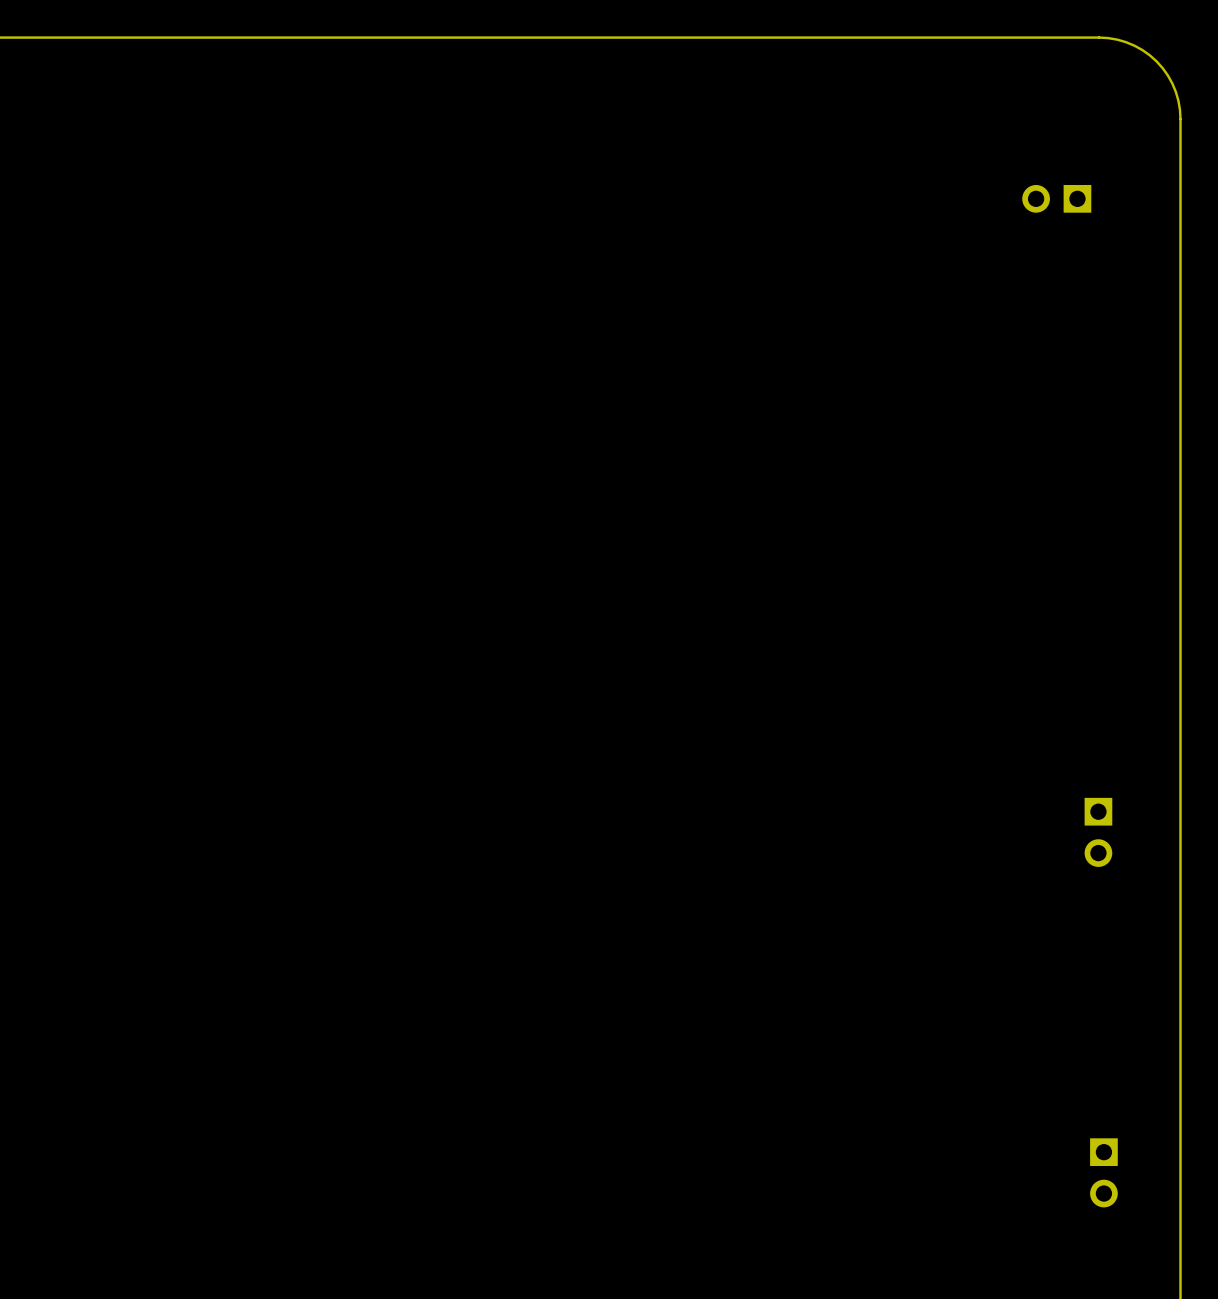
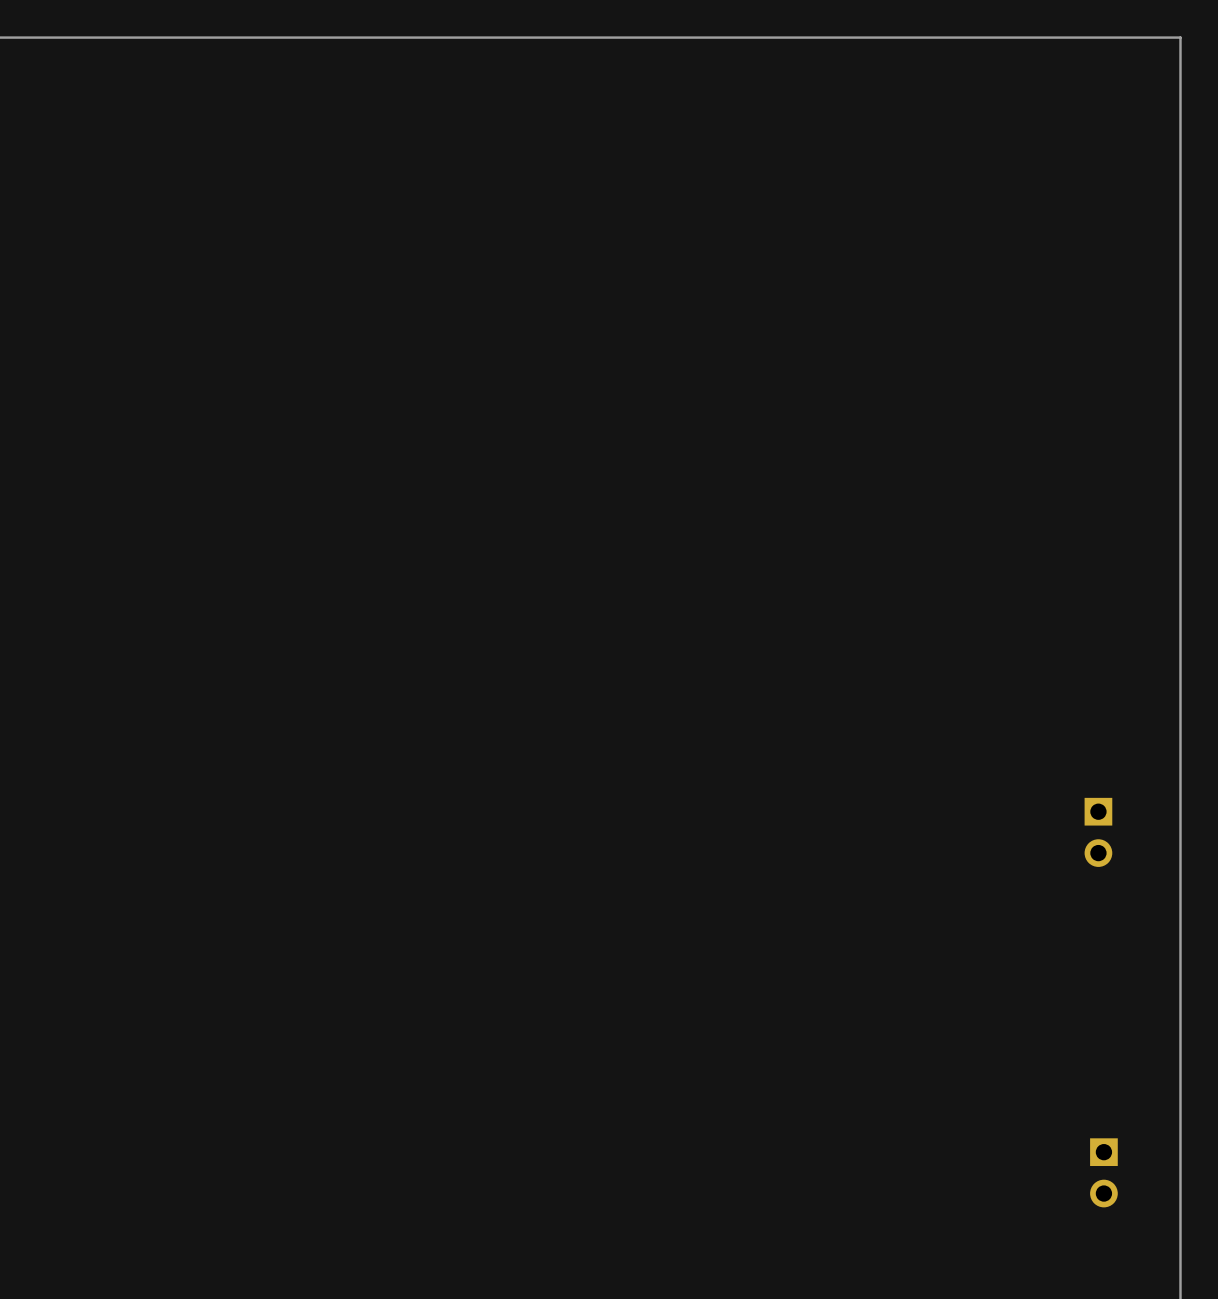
board edge: (1099, 37) (1117, 39) (1134, 45) (1156, 61) (1168, 75) (1175, 92) (1180, 119) -> (1099, 37) (1180, 37) (1180, 119)
part: (1056, 198) -> none

